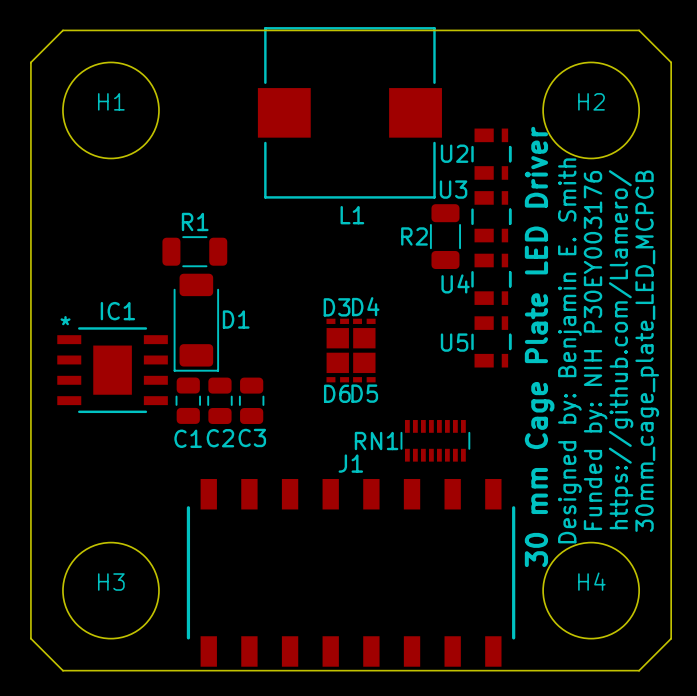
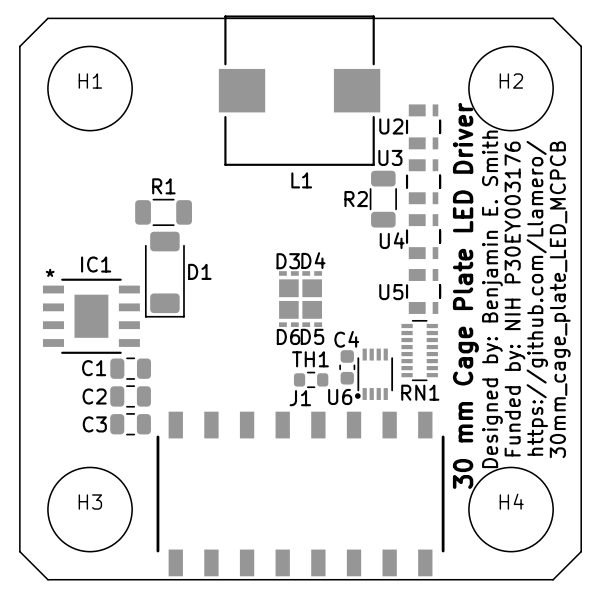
C1 rotation: 0° (188, 400) -> 90° clockwise (130, 368)
C1 position: (188, 400) -> (130, 368)
C2 rotation: 0° (219, 400) -> 90° clockwise (130, 396)
C2 position: (219, 400) -> (130, 396)
C3 rotation: 0° (251, 400) -> 90° clockwise (130, 424)
C3 position: (251, 400) -> (130, 424)
C4: none -> (347, 367)
U6: none -> (374, 374)
RN1 rotation: 0° (435, 440) -> 90° clockwise (419, 350)
RN1 position: (435, 440) -> (419, 350)
RN1 name position: RN1 (376, 441) -> RN1 (420, 392)
TH1: none -> (311, 379)

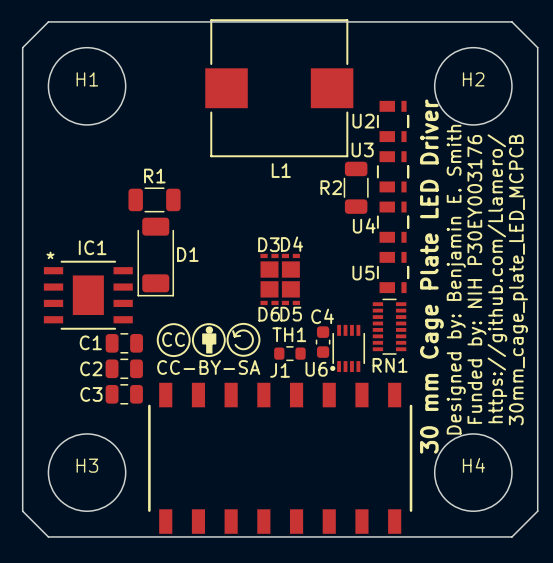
drawing: none -> [156, 322, 261, 358]

